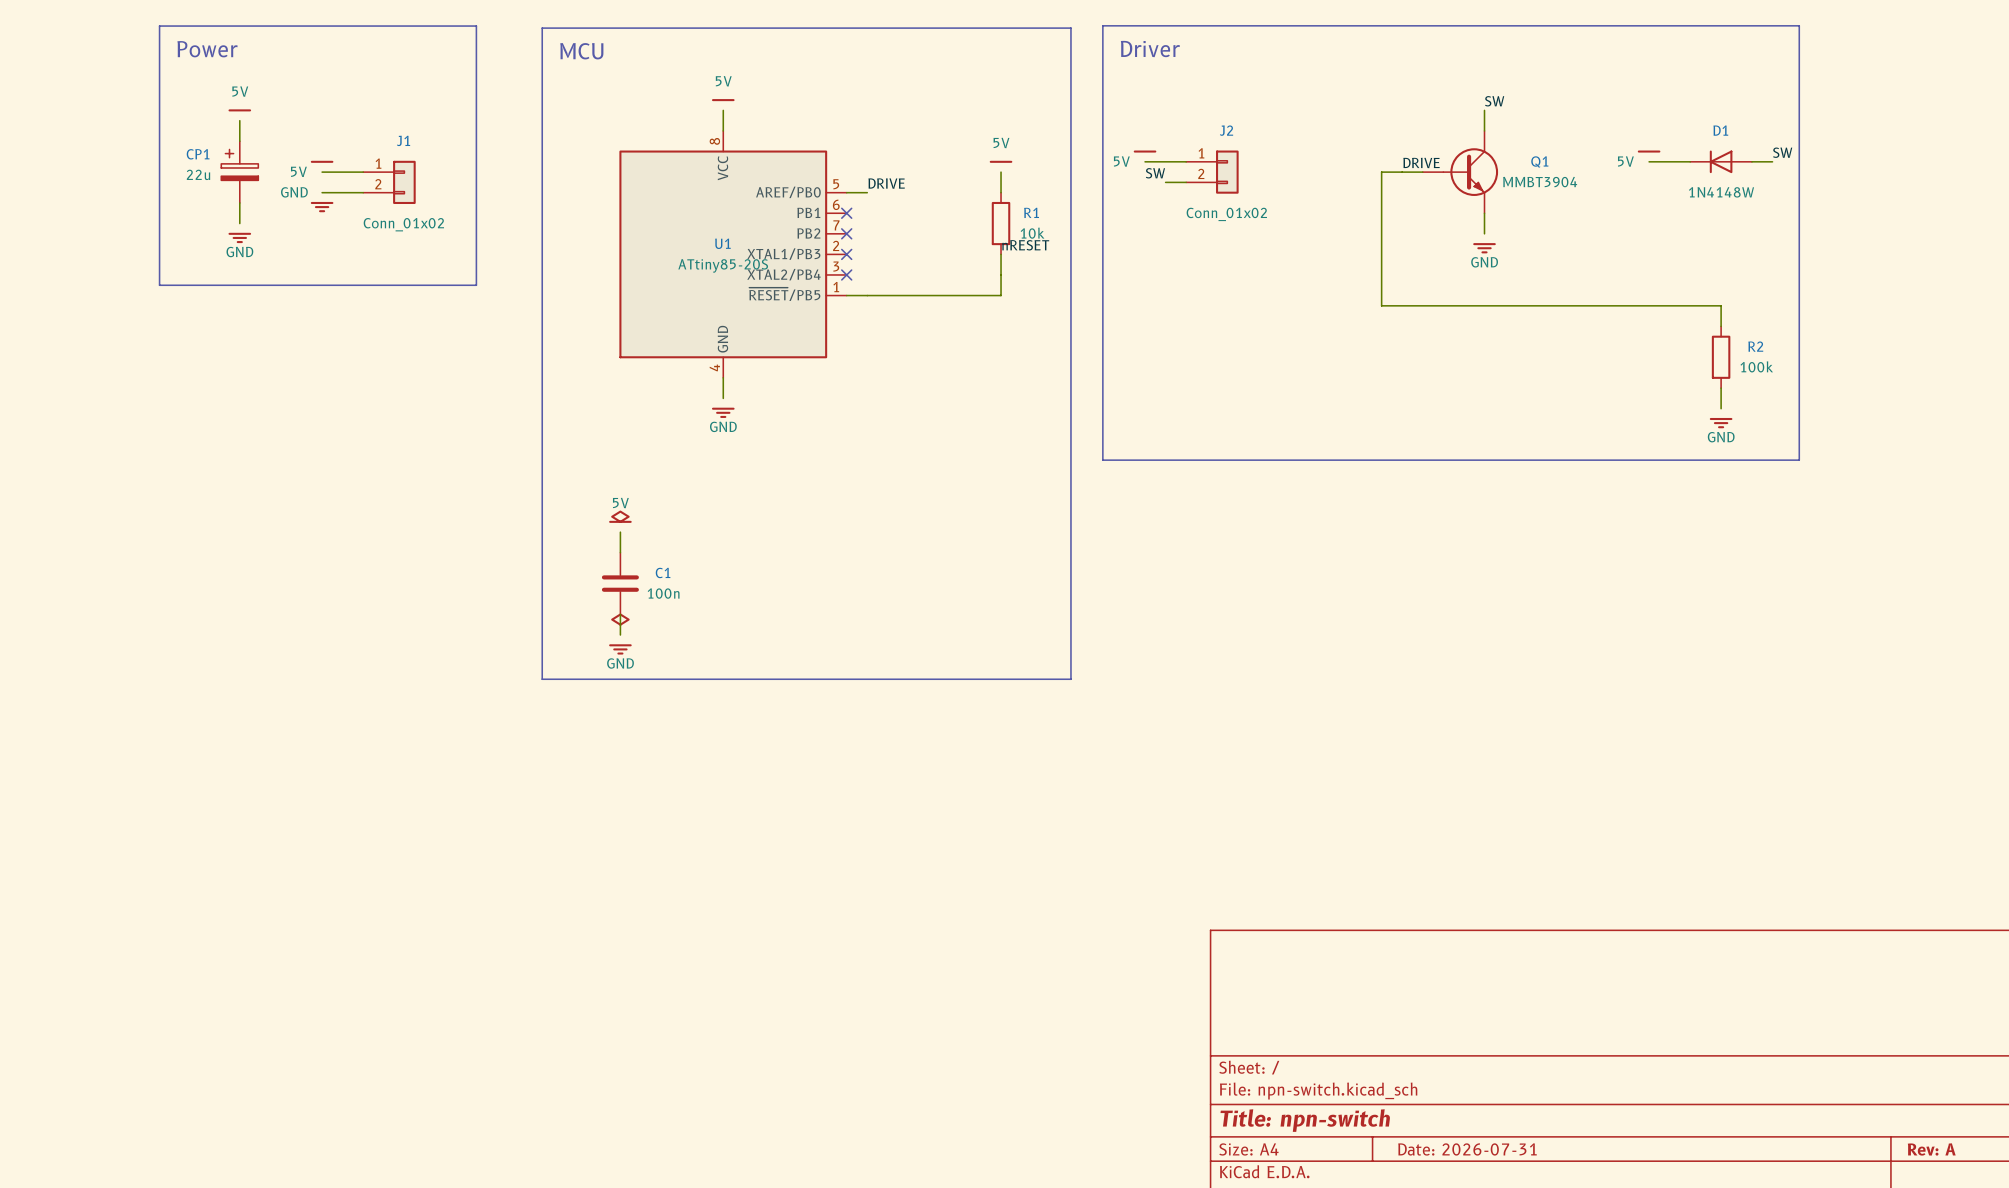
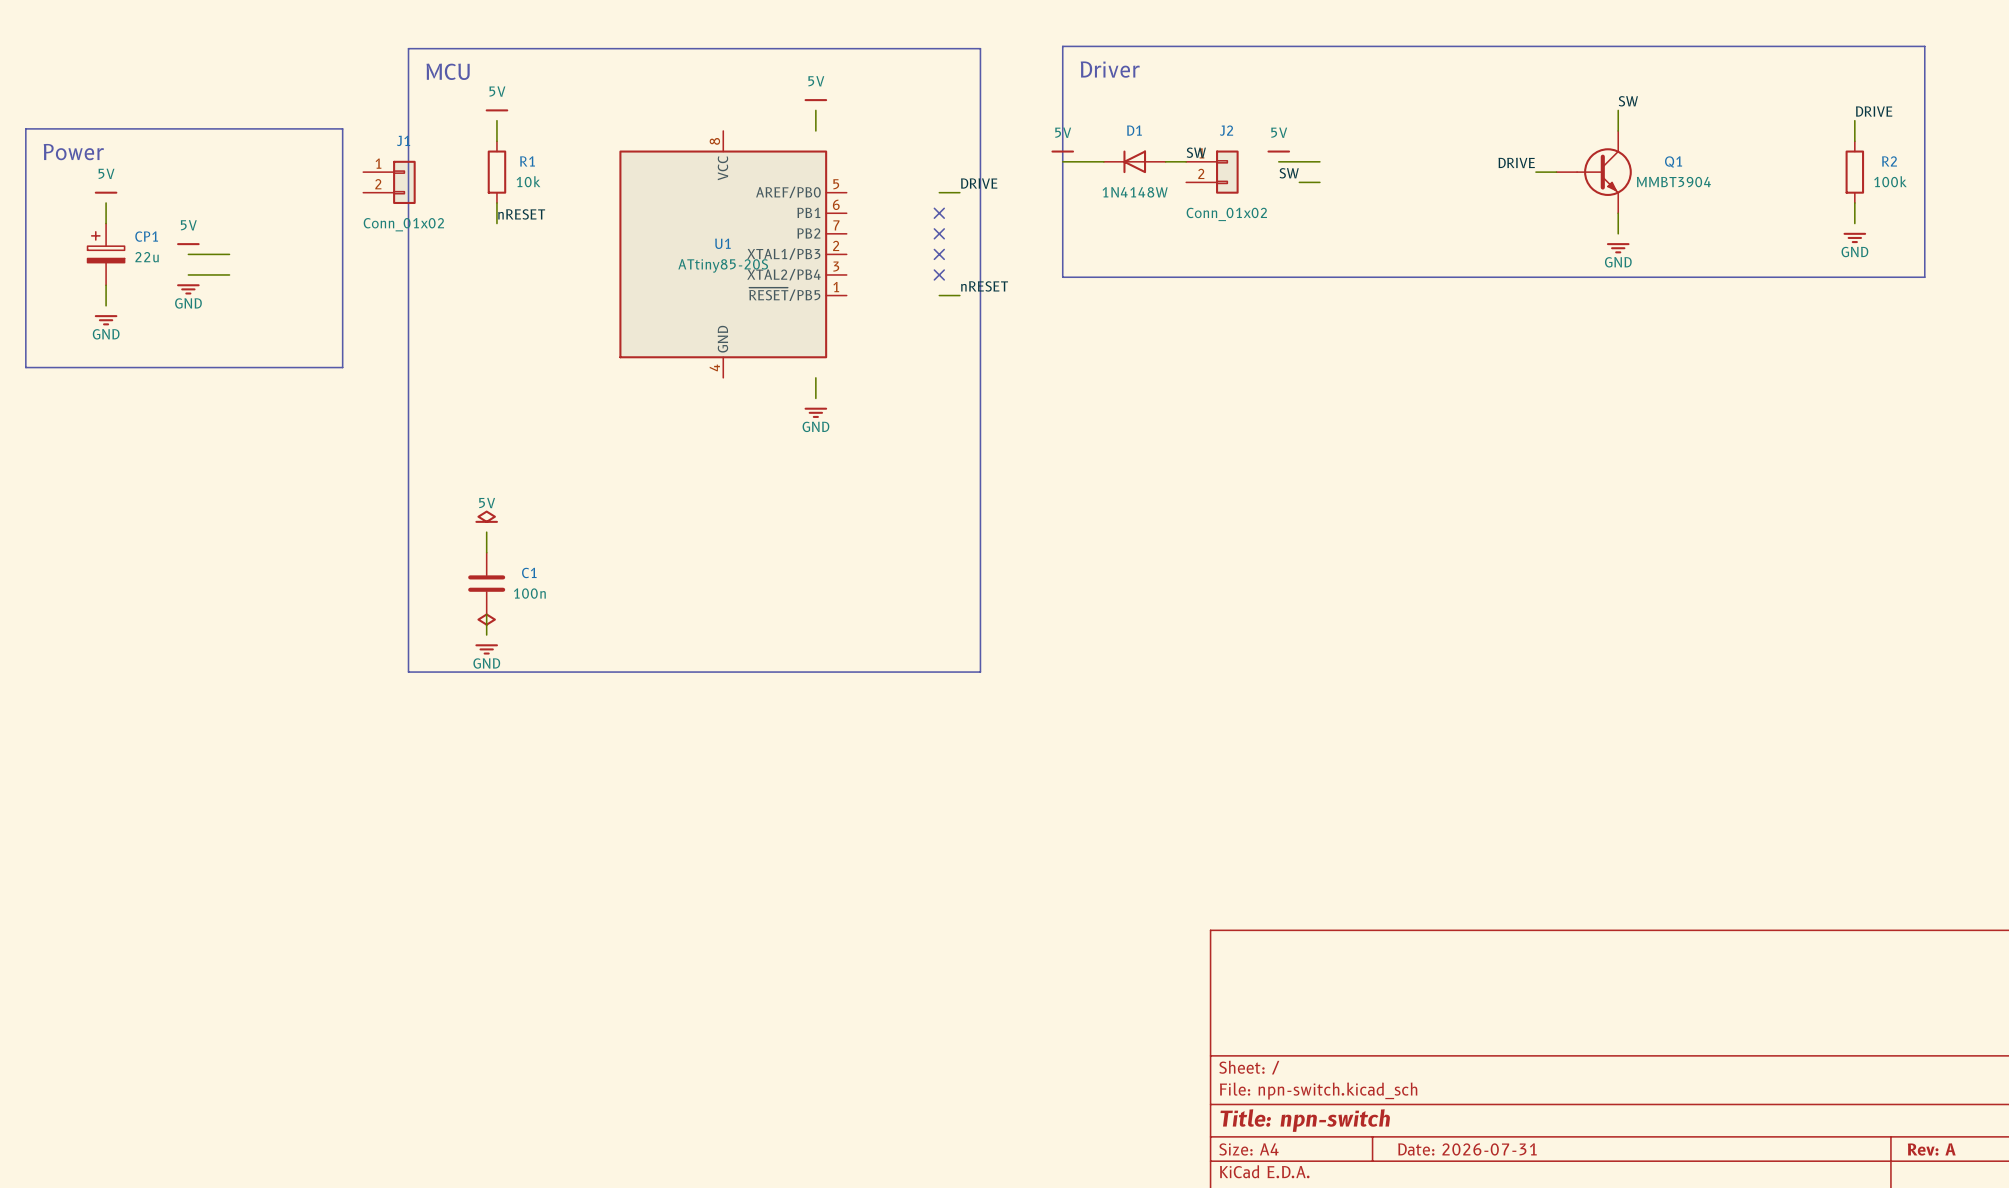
line: (1102, 25) (1799, 25) (1799, 460) (1102, 460) (1102, 25) -> none
line: (159, 26) (476, 26) (476, 285) (159, 285) (159, 26) -> none
line: (542, 28) (1070, 28) (1070, 679) (542, 679) (542, 28) -> (408, 48) (408, 672) (980, 672) (980, 48) (408, 48)
line: none -> (1062, 46) (1924, 46) (1924, 277) (1062, 277) (1062, 46)
text position: Power (207, 49) -> Power (73, 152)
text position: Driver (1150, 49) -> Driver (1110, 69)
text position: MCU (581, 51) -> MCU (448, 71)
power symbol position: 5V (723, 100) -> 5V (815, 100)
label: SW (1494, 101) -> none
label: none -> SW (1628, 101)
power symbol: 5V (239, 110) -> none
power symbol: none -> 5V (496, 110)
wire: (723, 110) (723, 130) -> (815, 110) (815, 130)
wire: (1484, 110) (1484, 130) -> (1618, 110) (1618, 130)
label: none -> DRIVE (1874, 111)
wire: (239, 120) (239, 141) -> (106, 202) (106, 223)
wire: none -> (496, 120) (496, 141)
wire: none -> (1854, 120) (1854, 141)
line: none -> (25, 128) (342, 128) (342, 367) (25, 367) (25, 128)
power symbol: none -> 5V (1062, 151)
power symbol: 5V (1145, 151) -> none
power symbol: none -> 5V (1278, 151)
power symbol: 5V (1649, 151) -> none
label: SW (1782, 152) -> none
CP1 name position: CP1 (198, 154) -> CP1 (146, 236)
power symbol: 5V (322, 161) -> none
power symbol: 5V (1001, 161) -> none
wire: none -> (1062, 161) (1103, 161)
wire: none -> (1278, 161) (1319, 161)
wire: (1649, 161) (1690, 161) -> none
D1 position: (1721, 161) -> (1134, 161)
wire: (1751, 161) (1772, 161) -> none
label position: DRIVE (1421, 163) -> DRIVE (1516, 163)
CP1 position: (239, 172) -> (106, 254)
wire: (322, 172) (363, 172) -> (188, 254) (229, 254)
wire: (1001, 172) (1001, 192) -> none
wire: (1422, 172) (1381, 172) (1381, 305) (1721, 305) (1721, 326) -> none
Q1 position: (1460, 172) -> (1594, 172)
wire: none -> (1535, 172) (1556, 172)
label position: SW (1155, 173) -> SW (1196, 152)
label: none -> SW (1289, 173)
CP1 value position: 22u (198, 174) -> 22u (147, 257)
wire: (1165, 182) (1186, 182) -> (1299, 182) (1319, 182)
label position: DRIVE (886, 183) -> DRIVE (979, 183)
power symbol: none -> 5V (106, 192)
wire: (322, 192) (363, 192) -> (188, 274) (229, 274)
wire: (846, 192) (867, 192) -> (939, 192) (959, 192)
wire: (239, 202) (239, 223) -> (106, 285) (106, 305)
wire: none -> (496, 202) (496, 223)
wire: none -> (1854, 202) (1854, 223)
power symbol: GND (322, 207) -> none
no-connect mark: (846, 213) -> none
no-connect mark: none -> (939, 213)
wire: (1484, 213) (1484, 233) -> (1618, 213) (1618, 233)
label: none -> nRESET (521, 214)
R1 position: (1001, 223) -> (496, 172)
no-connect mark: (846, 233) -> none
no-connect mark: none -> (939, 233)
power symbol position: GND (239, 237) -> GND (188, 289)
power symbol: none -> GND (1854, 237)
power symbol: none -> 5V (188, 244)
label position: nRESET (1025, 245) -> nRESET (984, 286)
power symbol: GND (1484, 248) -> none
power symbol: none -> GND (1618, 248)
no-connect mark: (846, 254) -> none
no-connect mark: none -> (939, 254)
wire: (1001, 254) (1001, 295) (959, 295) -> none
no-connect mark: (846, 274) -> none
no-connect mark: none -> (939, 274)
wire: (846, 295) (939, 295) -> none
power symbol: none -> GND (106, 320)
R2 position: (1721, 357) -> (1854, 172)
wire: (723, 377) (723, 398) -> (815, 377) (815, 398)
wire: (1721, 388) (1721, 408) -> none
power symbol position: GND (723, 412) -> GND (815, 412)
power symbol: GND (1721, 423) -> none
power symbol: none -> (486, 516)
power symbol: (620, 516) -> none
power symbol position: 5V (620, 521) -> 5V (486, 521)
wire: (620, 532) (620, 552) -> (486, 614) (486, 635)
C1 position: (620, 583) -> (486, 583)
wire: (620, 614) (620, 635) -> (486, 532) (486, 552)
power symbol: none -> (486, 619)
power symbol: (620, 619) -> none
power symbol position: GND (620, 649) -> GND (486, 649)

